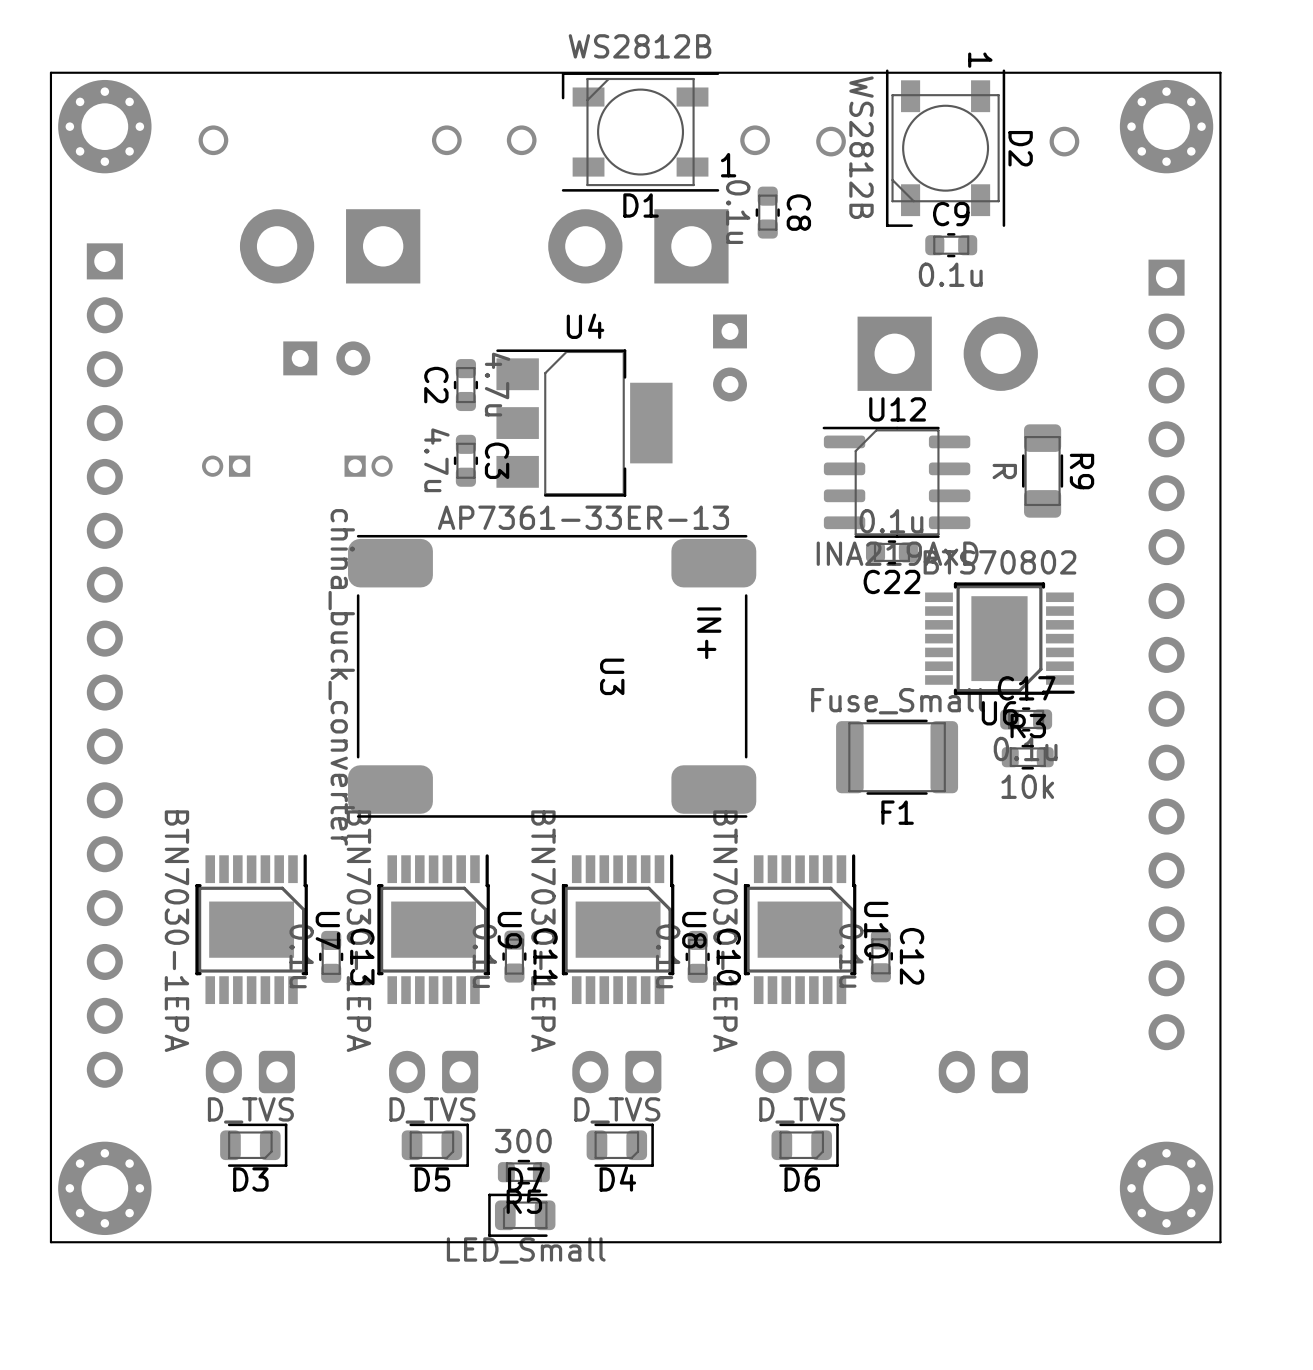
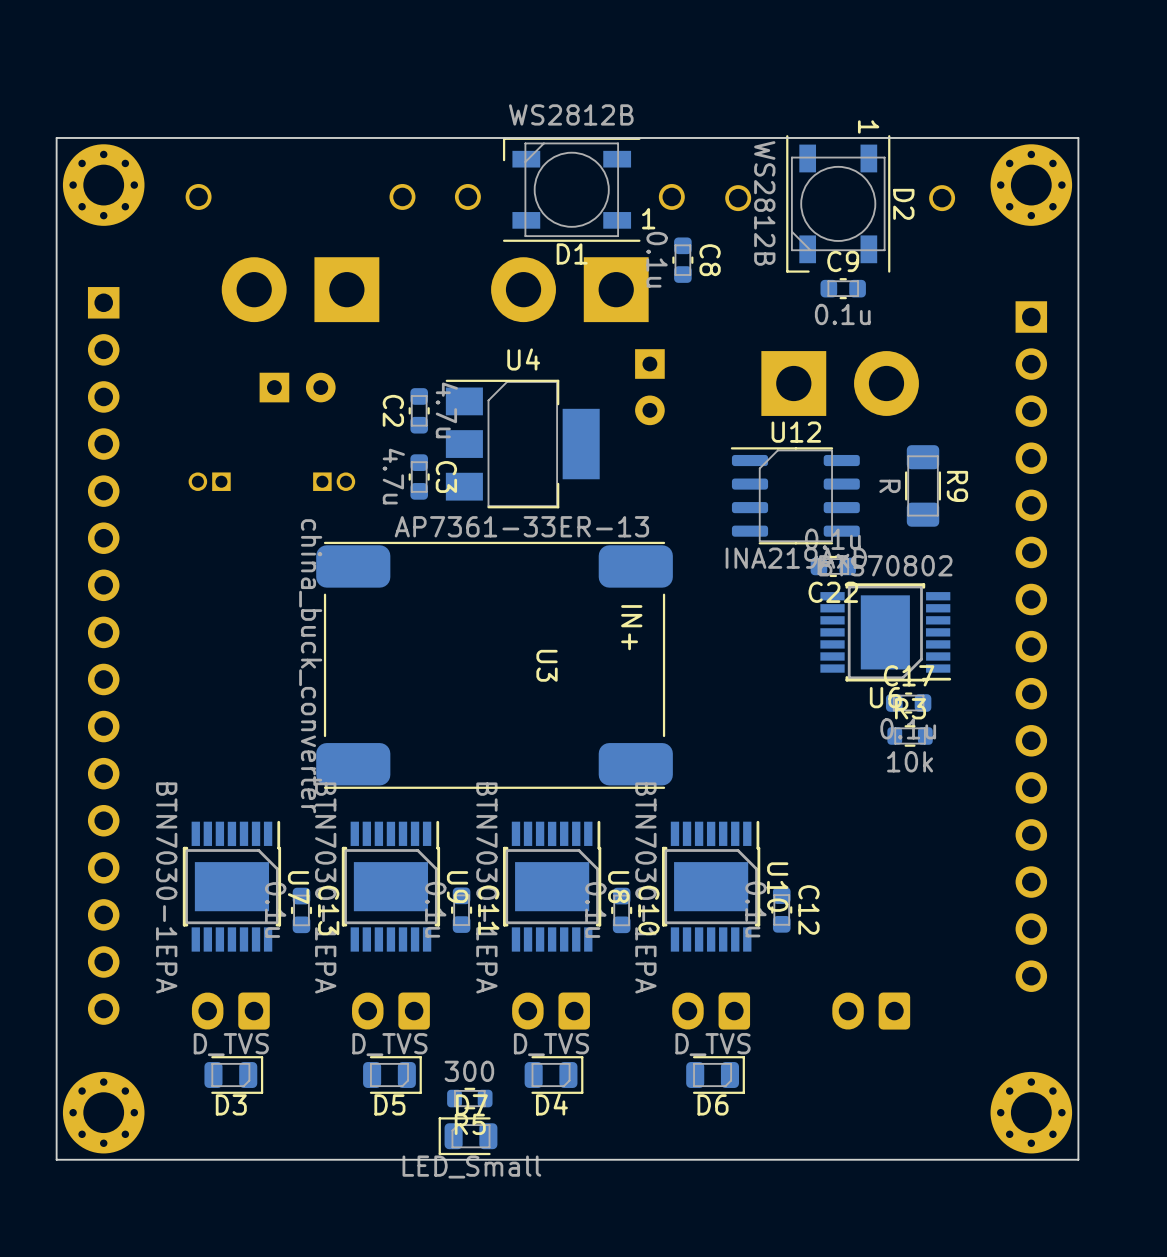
C22 position: (891, 552) -> (833, 566)
F1: Fuse_Small (897, 757) -> none

